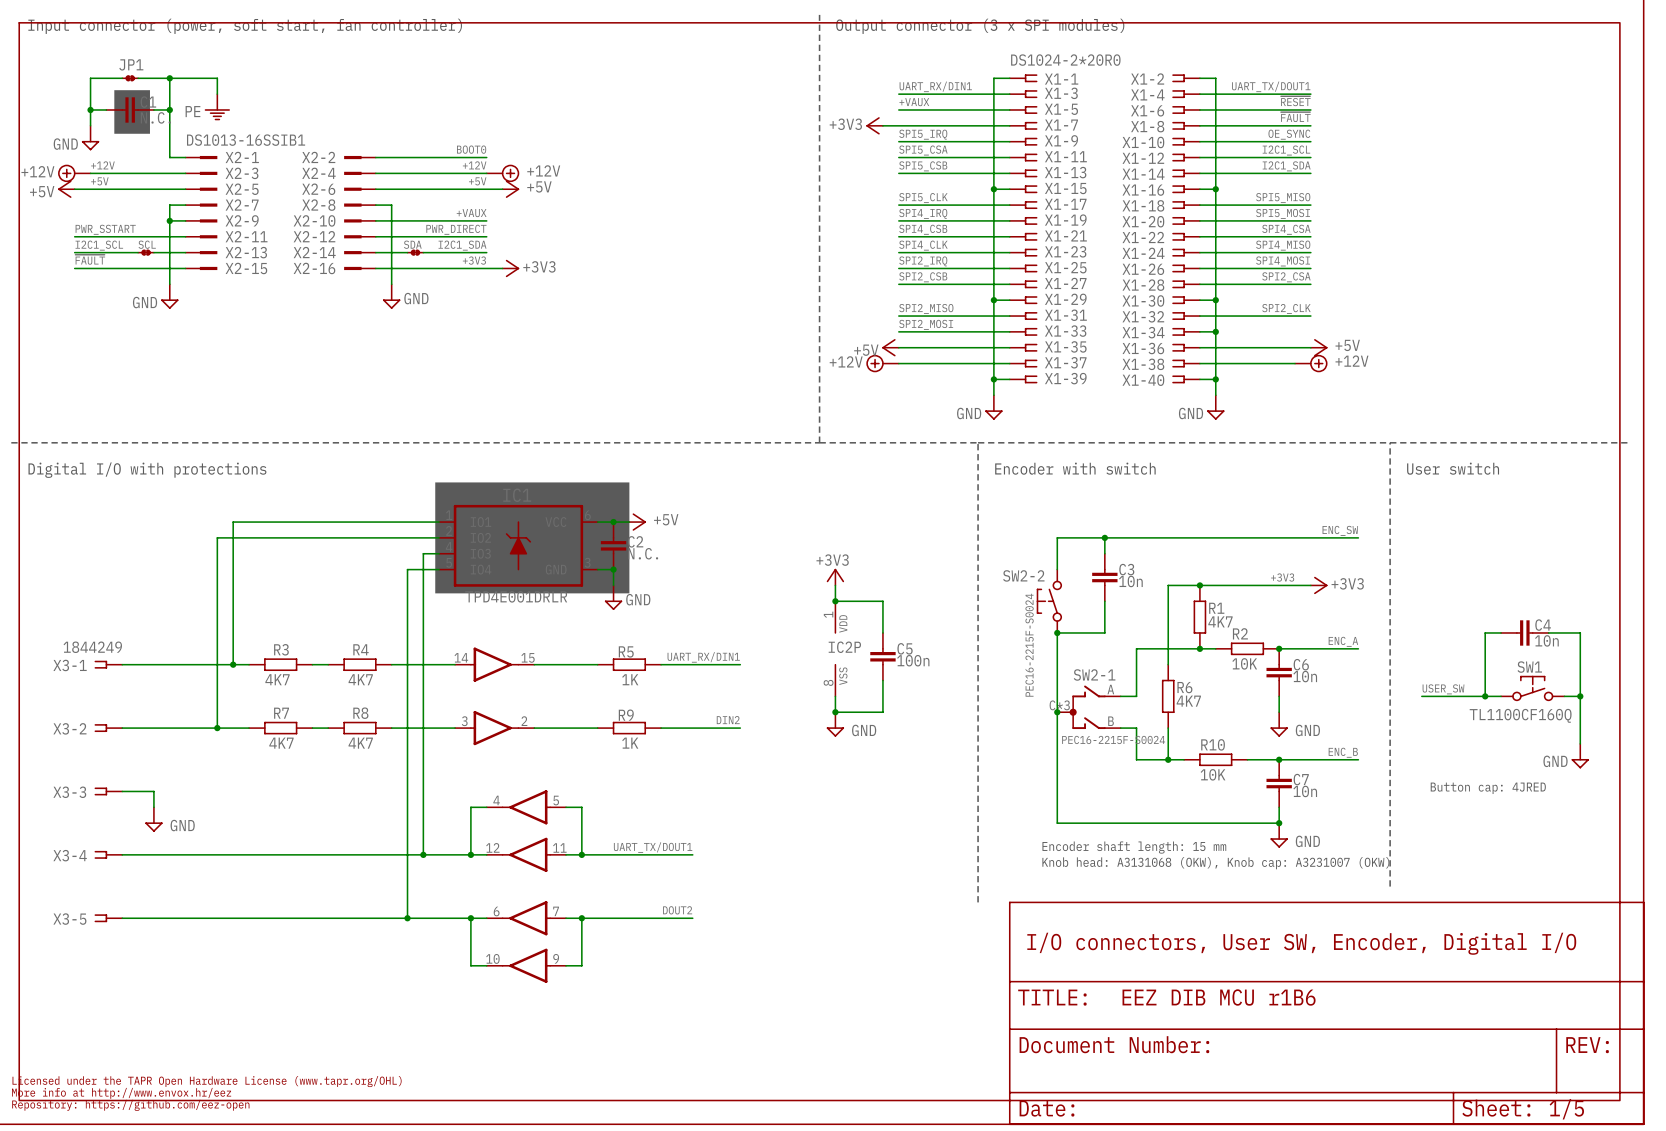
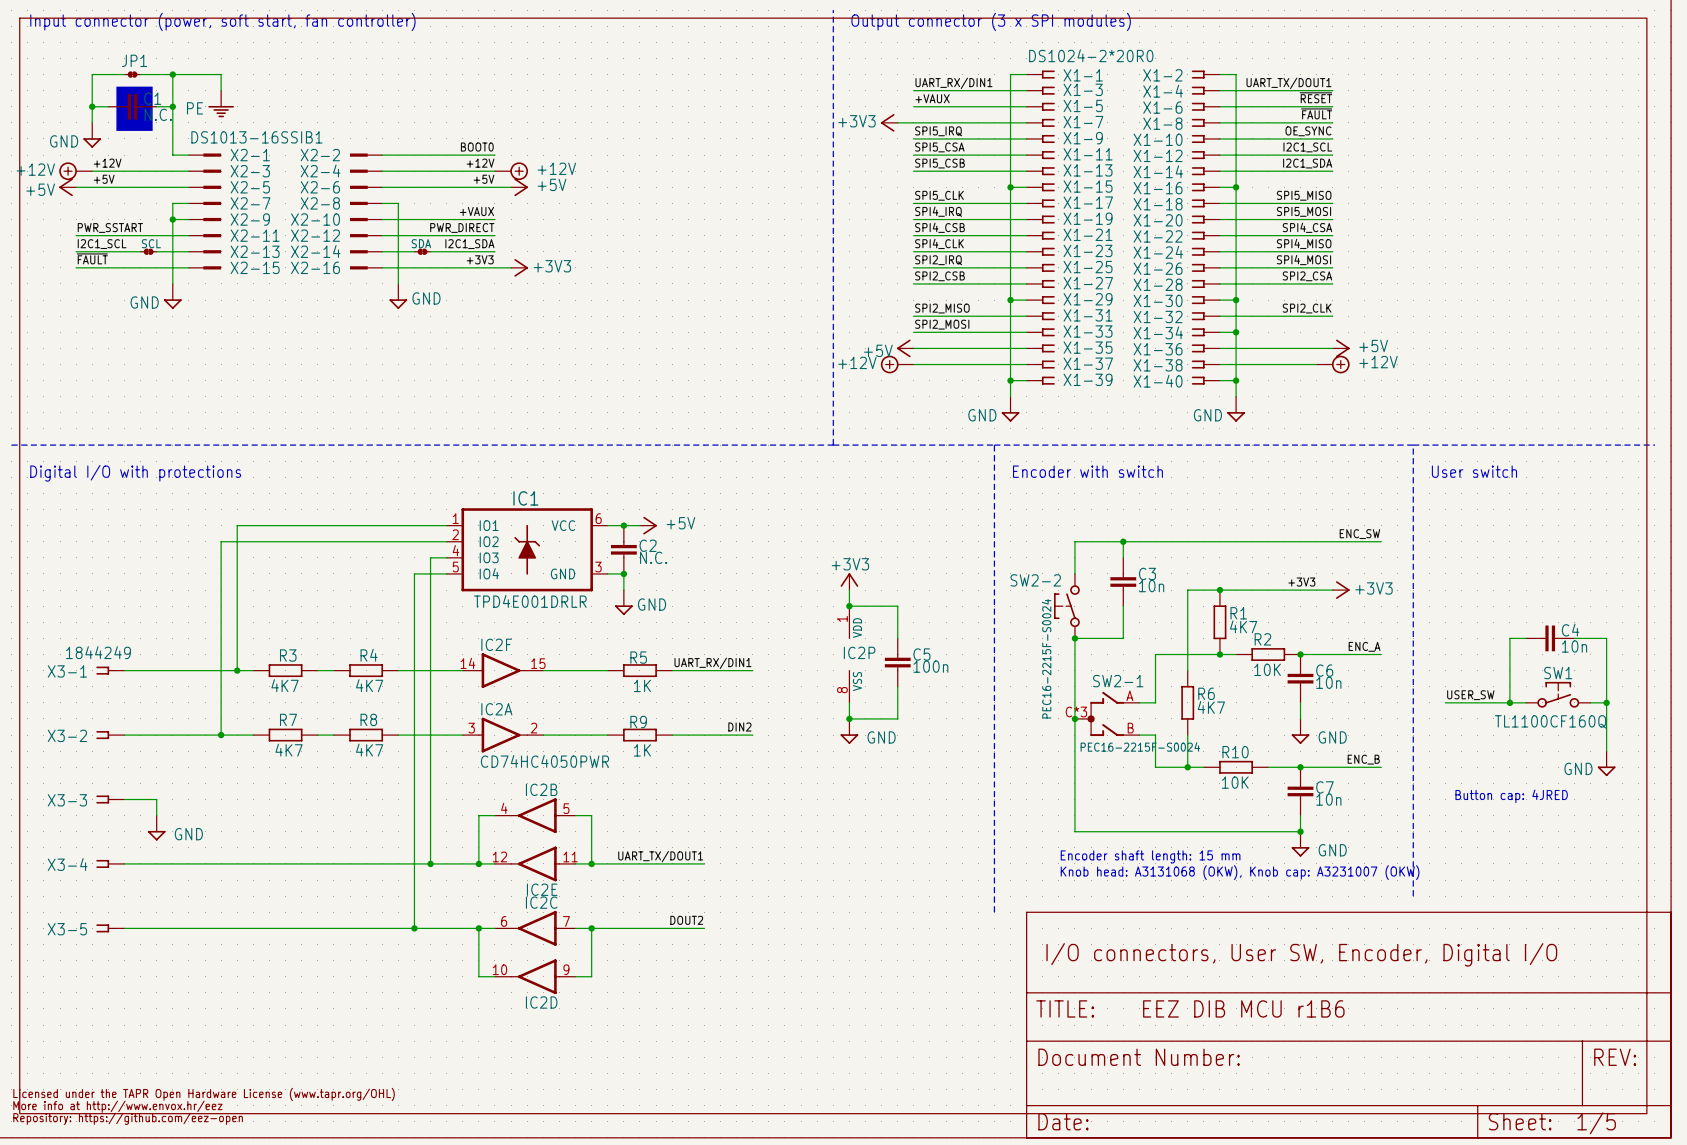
drawing: [435, 482, 630, 594] -> none
IC2F name: none -> IC2F (496, 644)
IC2A name: none -> IC2A (496, 709)
IC2A value: none -> CD74HC4050PWR (544, 761)
IC2B name: none -> IC2B (541, 789)
IC2E name: none -> IC2E (542, 889)
IC2C name: none -> IC2C (541, 902)
IC2D name: none -> IC2D (541, 1002)

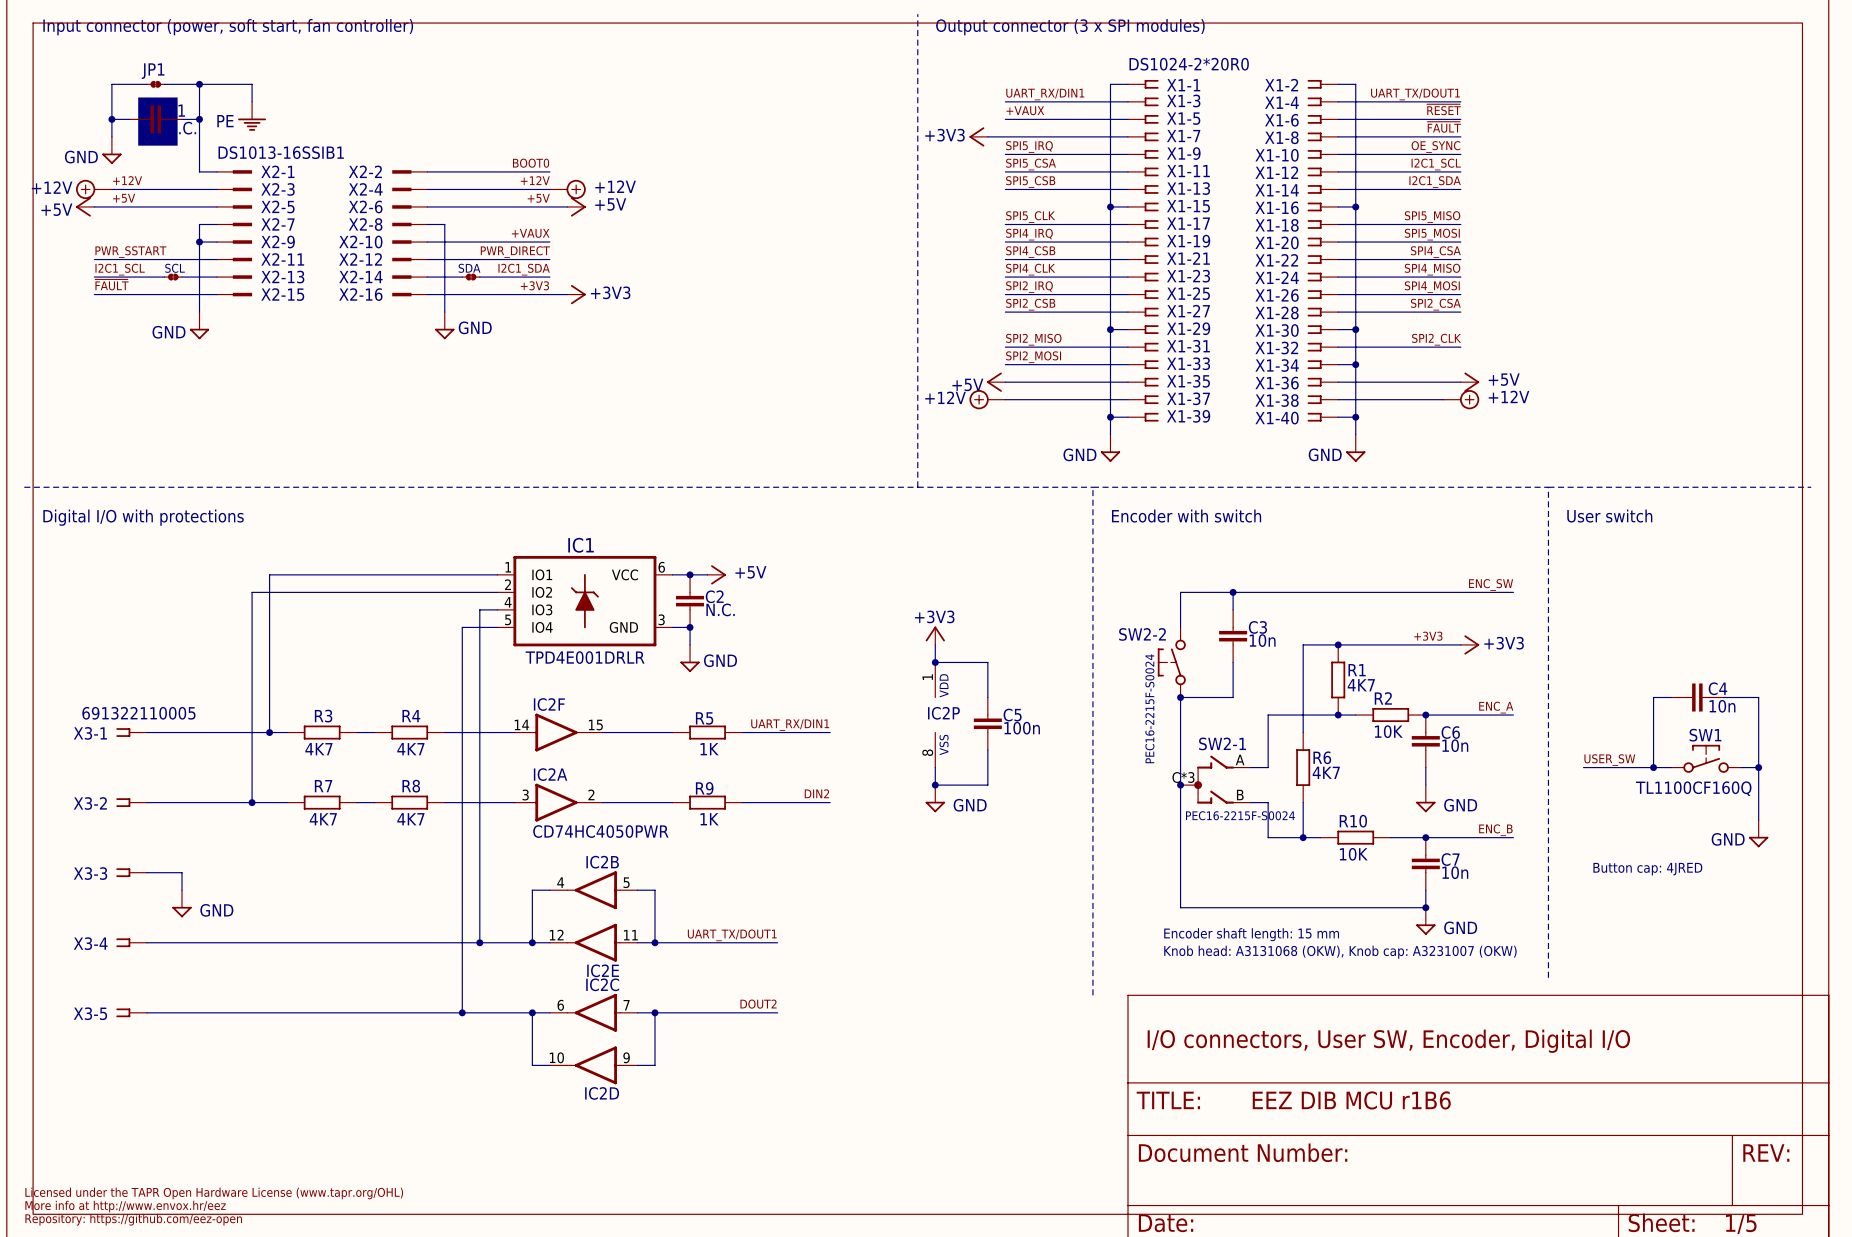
X3-1 value: 1844249 (98, 652) -> 691322110005 (138, 713)

